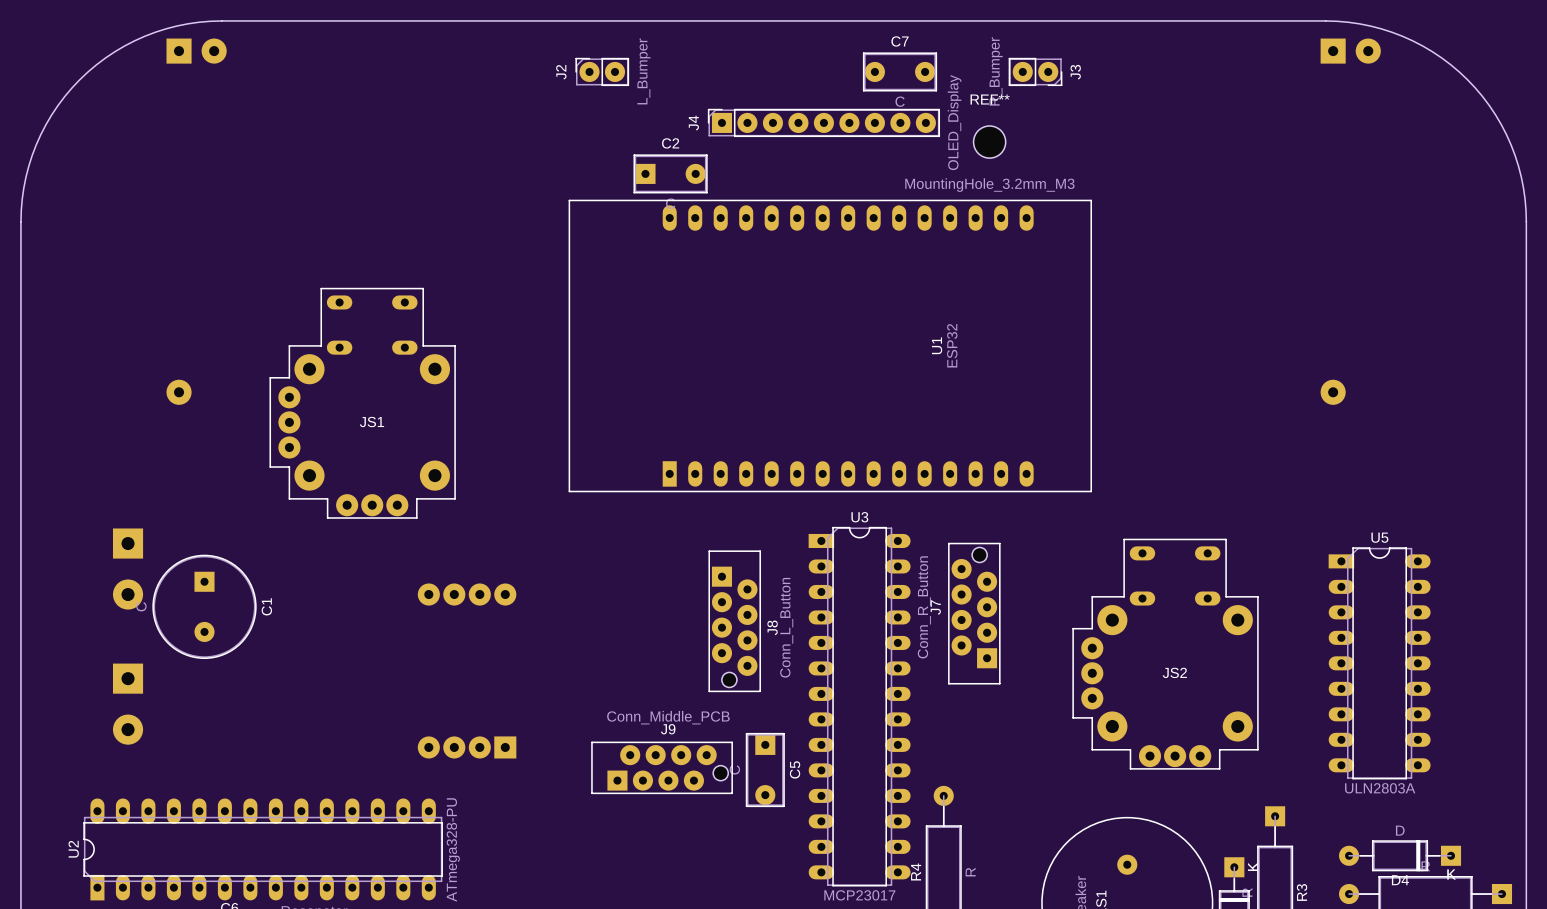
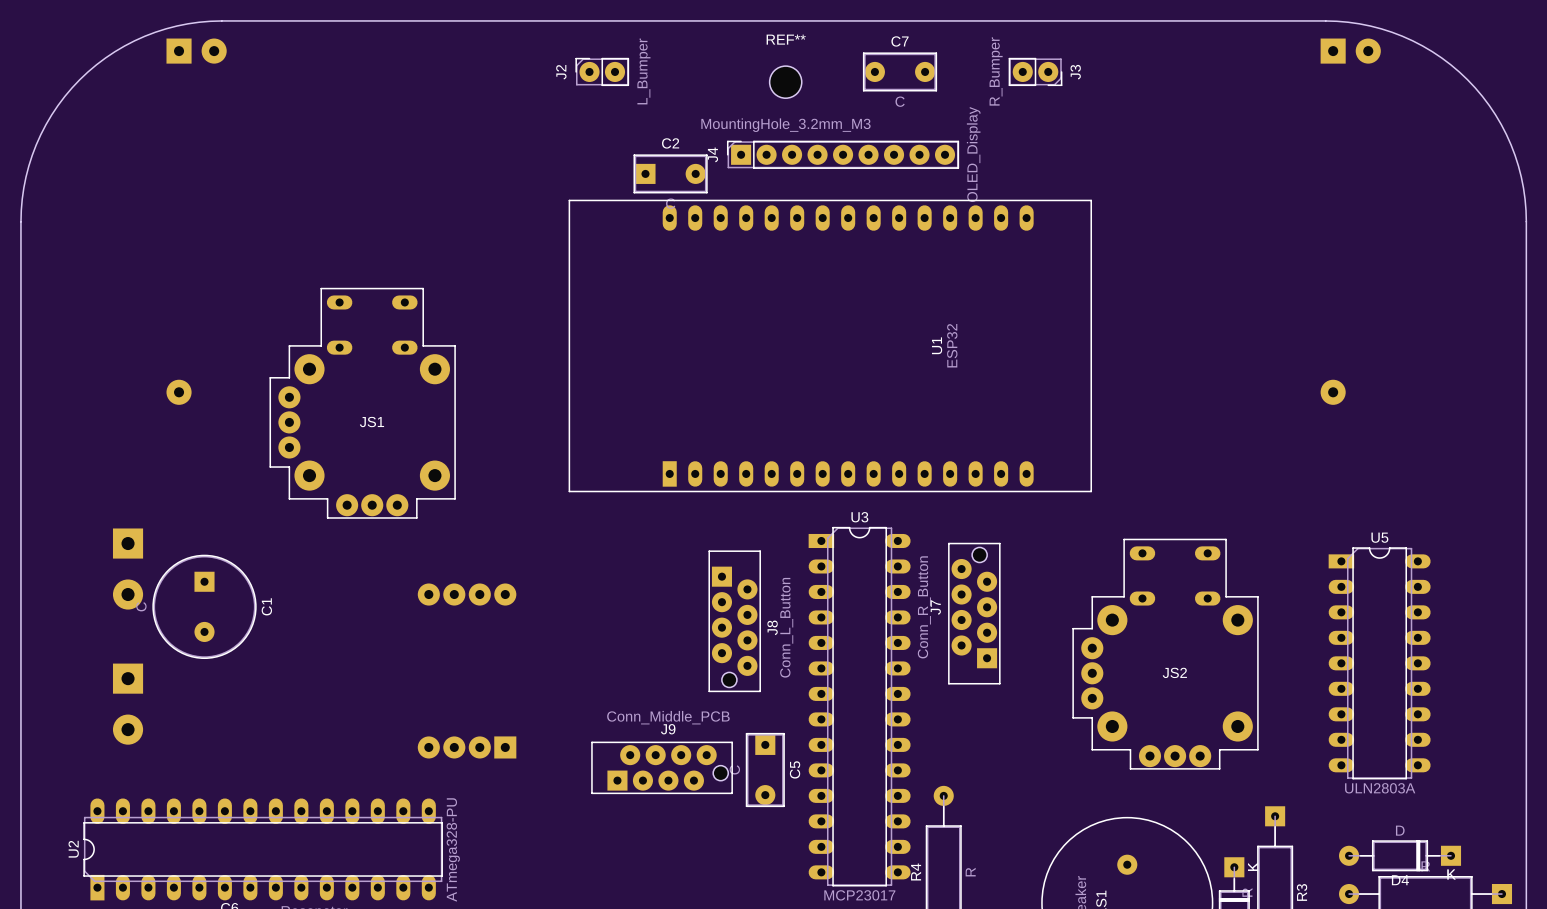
J4 position: (823, 122) -> (843, 154)
REF** position: (989, 142) -> (785, 82)

